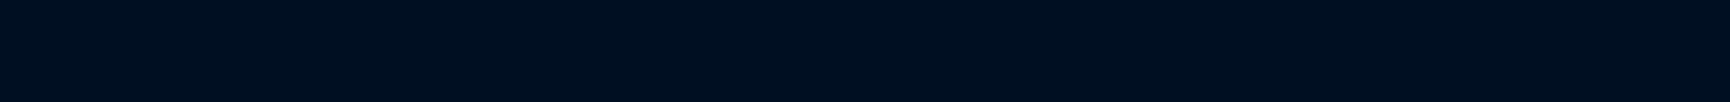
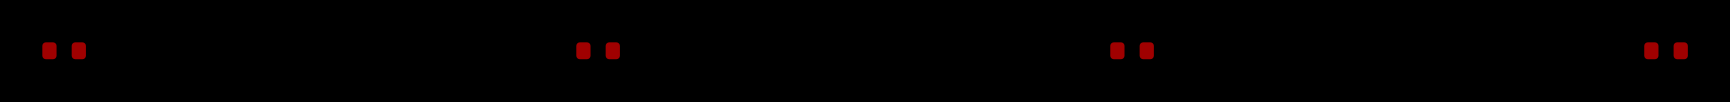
part: none -> (64, 50)
part: none -> (598, 50)
part: none -> (1132, 50)
part: none -> (1666, 50)

